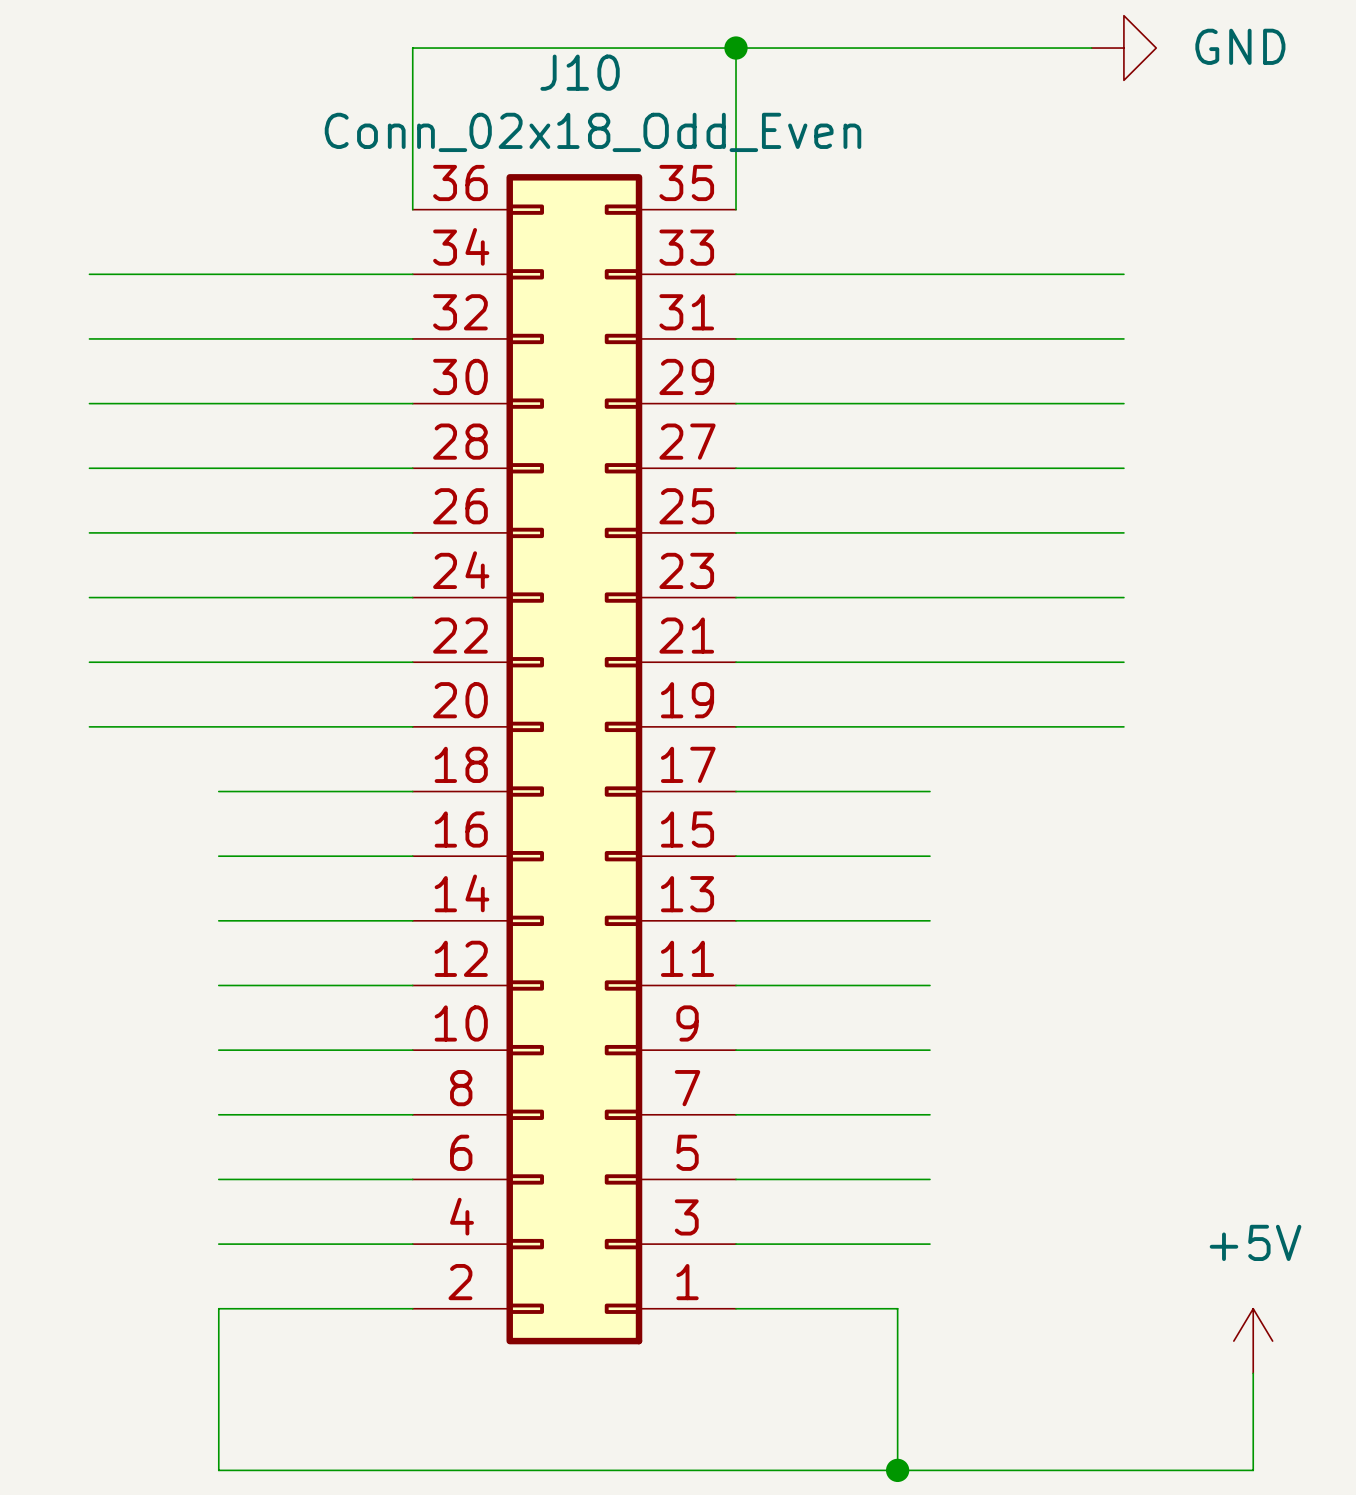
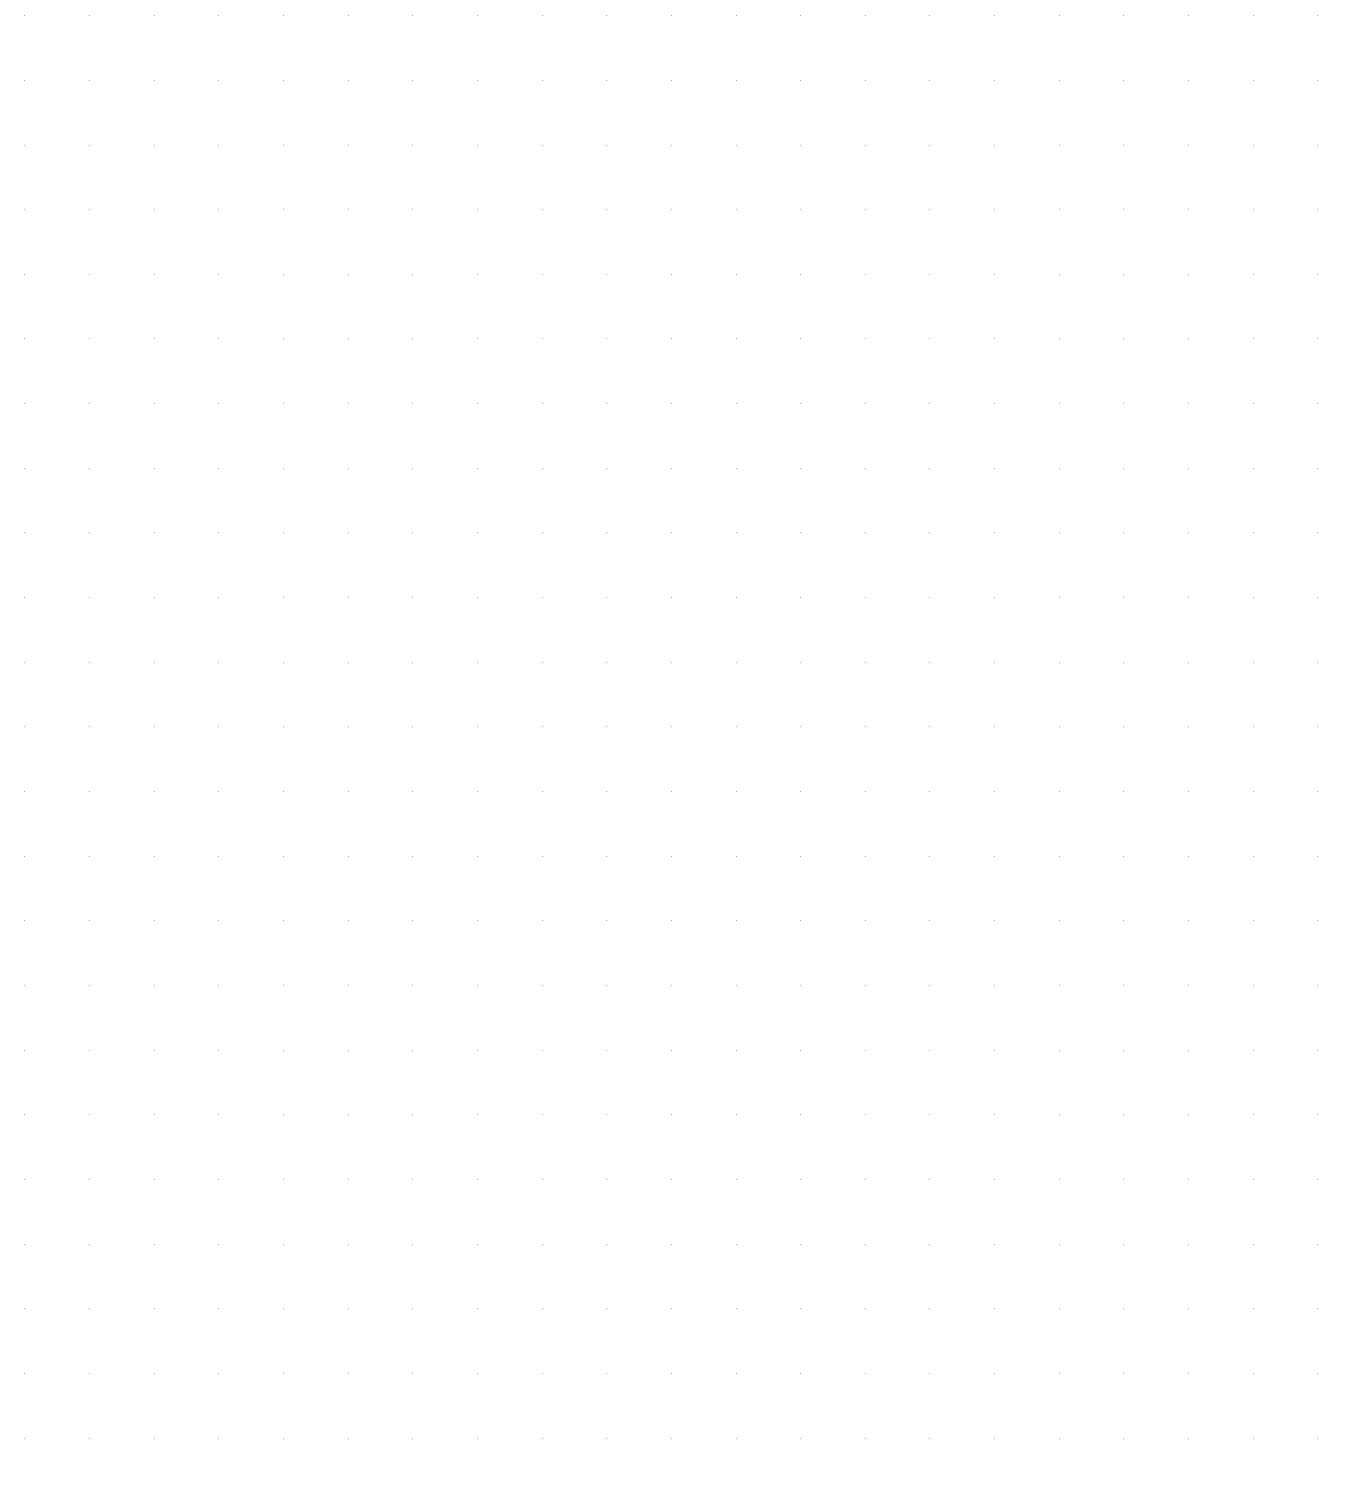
wire: (736, 48) (736, 209) -> none
junction: (736, 48) -> none
wire: (1091, 48) (412, 48) (412, 209) -> none
power symbol: GND (1123, 48) -> none
wire: (89, 274) (412, 274) -> none
wire: (736, 274) (1123, 274) -> none
wire: (89, 338) (412, 338) -> none
wire: (736, 338) (1123, 338) -> none
wire: (89, 403) (412, 403) -> none
wire: (736, 403) (1123, 403) -> none
wire: (89, 468) (412, 468) -> none
wire: (736, 468) (1123, 468) -> none
wire: (89, 532) (412, 532) -> none
wire: (736, 532) (1123, 532) -> none
wire: (89, 597) (412, 597) -> none
wire: (736, 597) (1123, 597) -> none
wire: (89, 662) (412, 662) -> none
wire: (736, 662) (1123, 662) -> none
wire: (89, 726) (412, 726) -> none
wire: (736, 726) (1123, 726) -> none
J10: Conn_02x18_Odd_Even (574, 759) -> none
wire: (218, 791) (412, 791) -> none
wire: (736, 791) (929, 791) -> none
wire: (218, 856) (412, 856) -> none
wire: (736, 856) (929, 856) -> none
wire: (218, 920) (412, 920) -> none
wire: (736, 920) (929, 920) -> none
wire: (218, 985) (412, 985) -> none
wire: (736, 985) (929, 985) -> none
wire: (218, 1050) (412, 1050) -> none
wire: (736, 1050) (929, 1050) -> none
wire: (218, 1114) (412, 1114) -> none
wire: (736, 1114) (929, 1114) -> none
wire: (218, 1179) (412, 1179) -> none
wire: (736, 1179) (929, 1179) -> none
wire: (218, 1244) (412, 1244) -> none
wire: (736, 1244) (929, 1244) -> none
wire: (412, 1308) (218, 1308) (218, 1470) (1253, 1470) (1253, 1373) -> none
wire: (736, 1308) (897, 1308) (897, 1470) -> none
power symbol: +5V (1253, 1341) -> none
junction: (897, 1470) -> none

